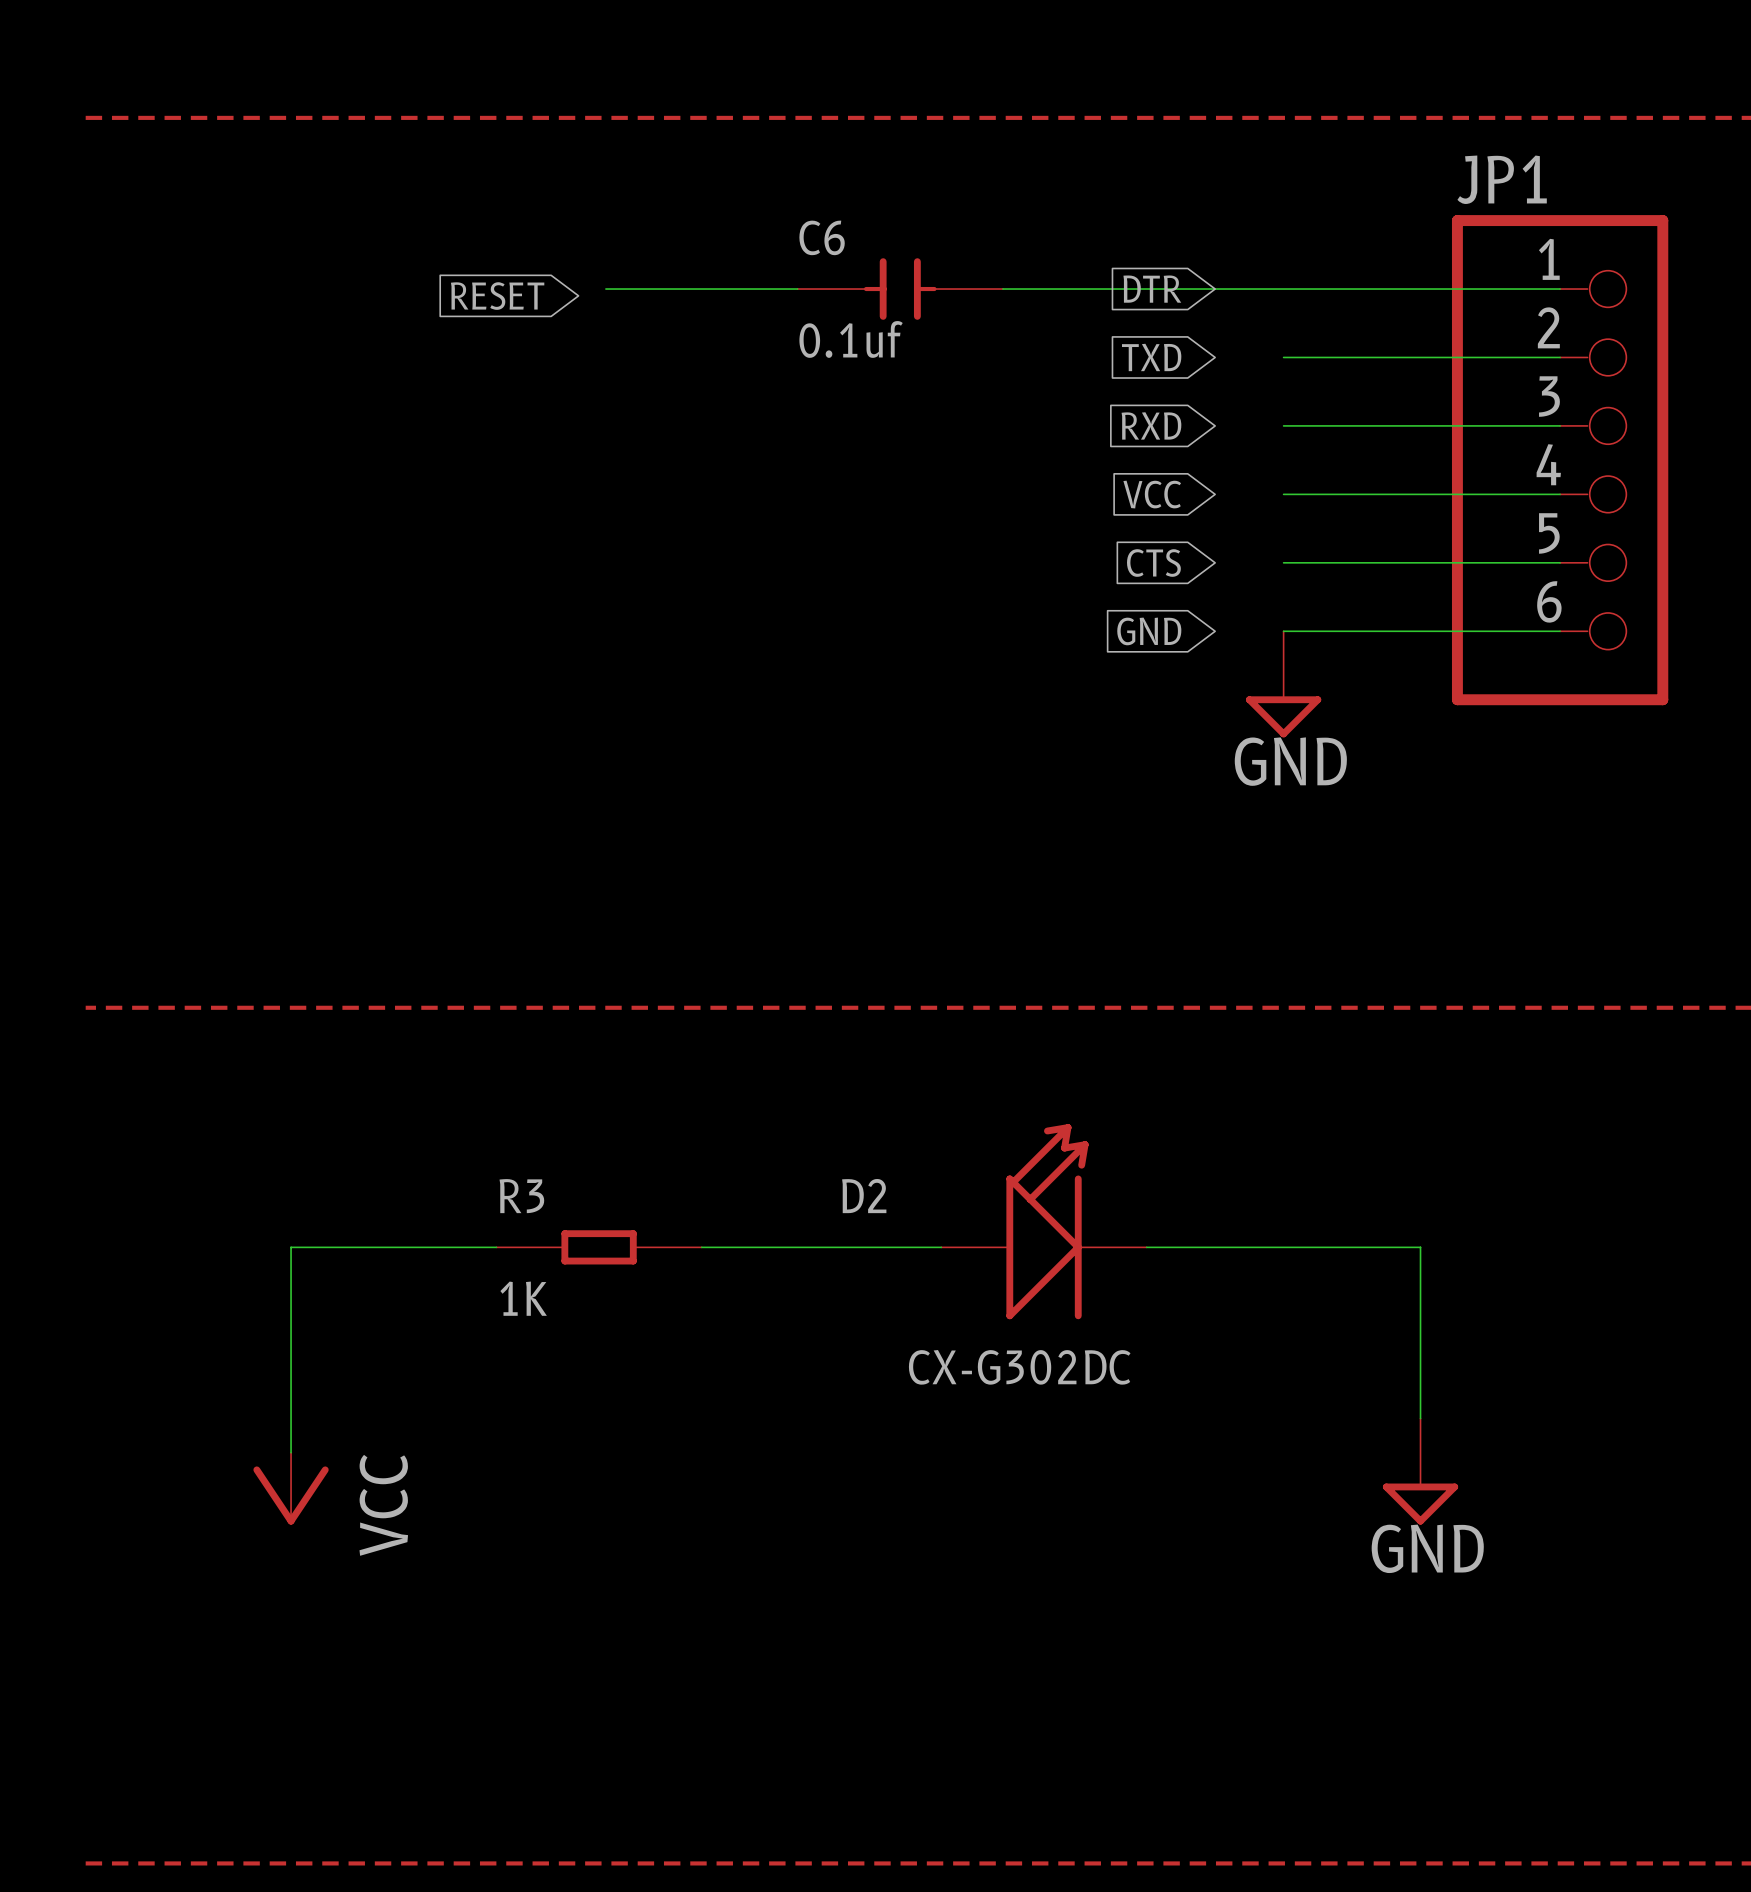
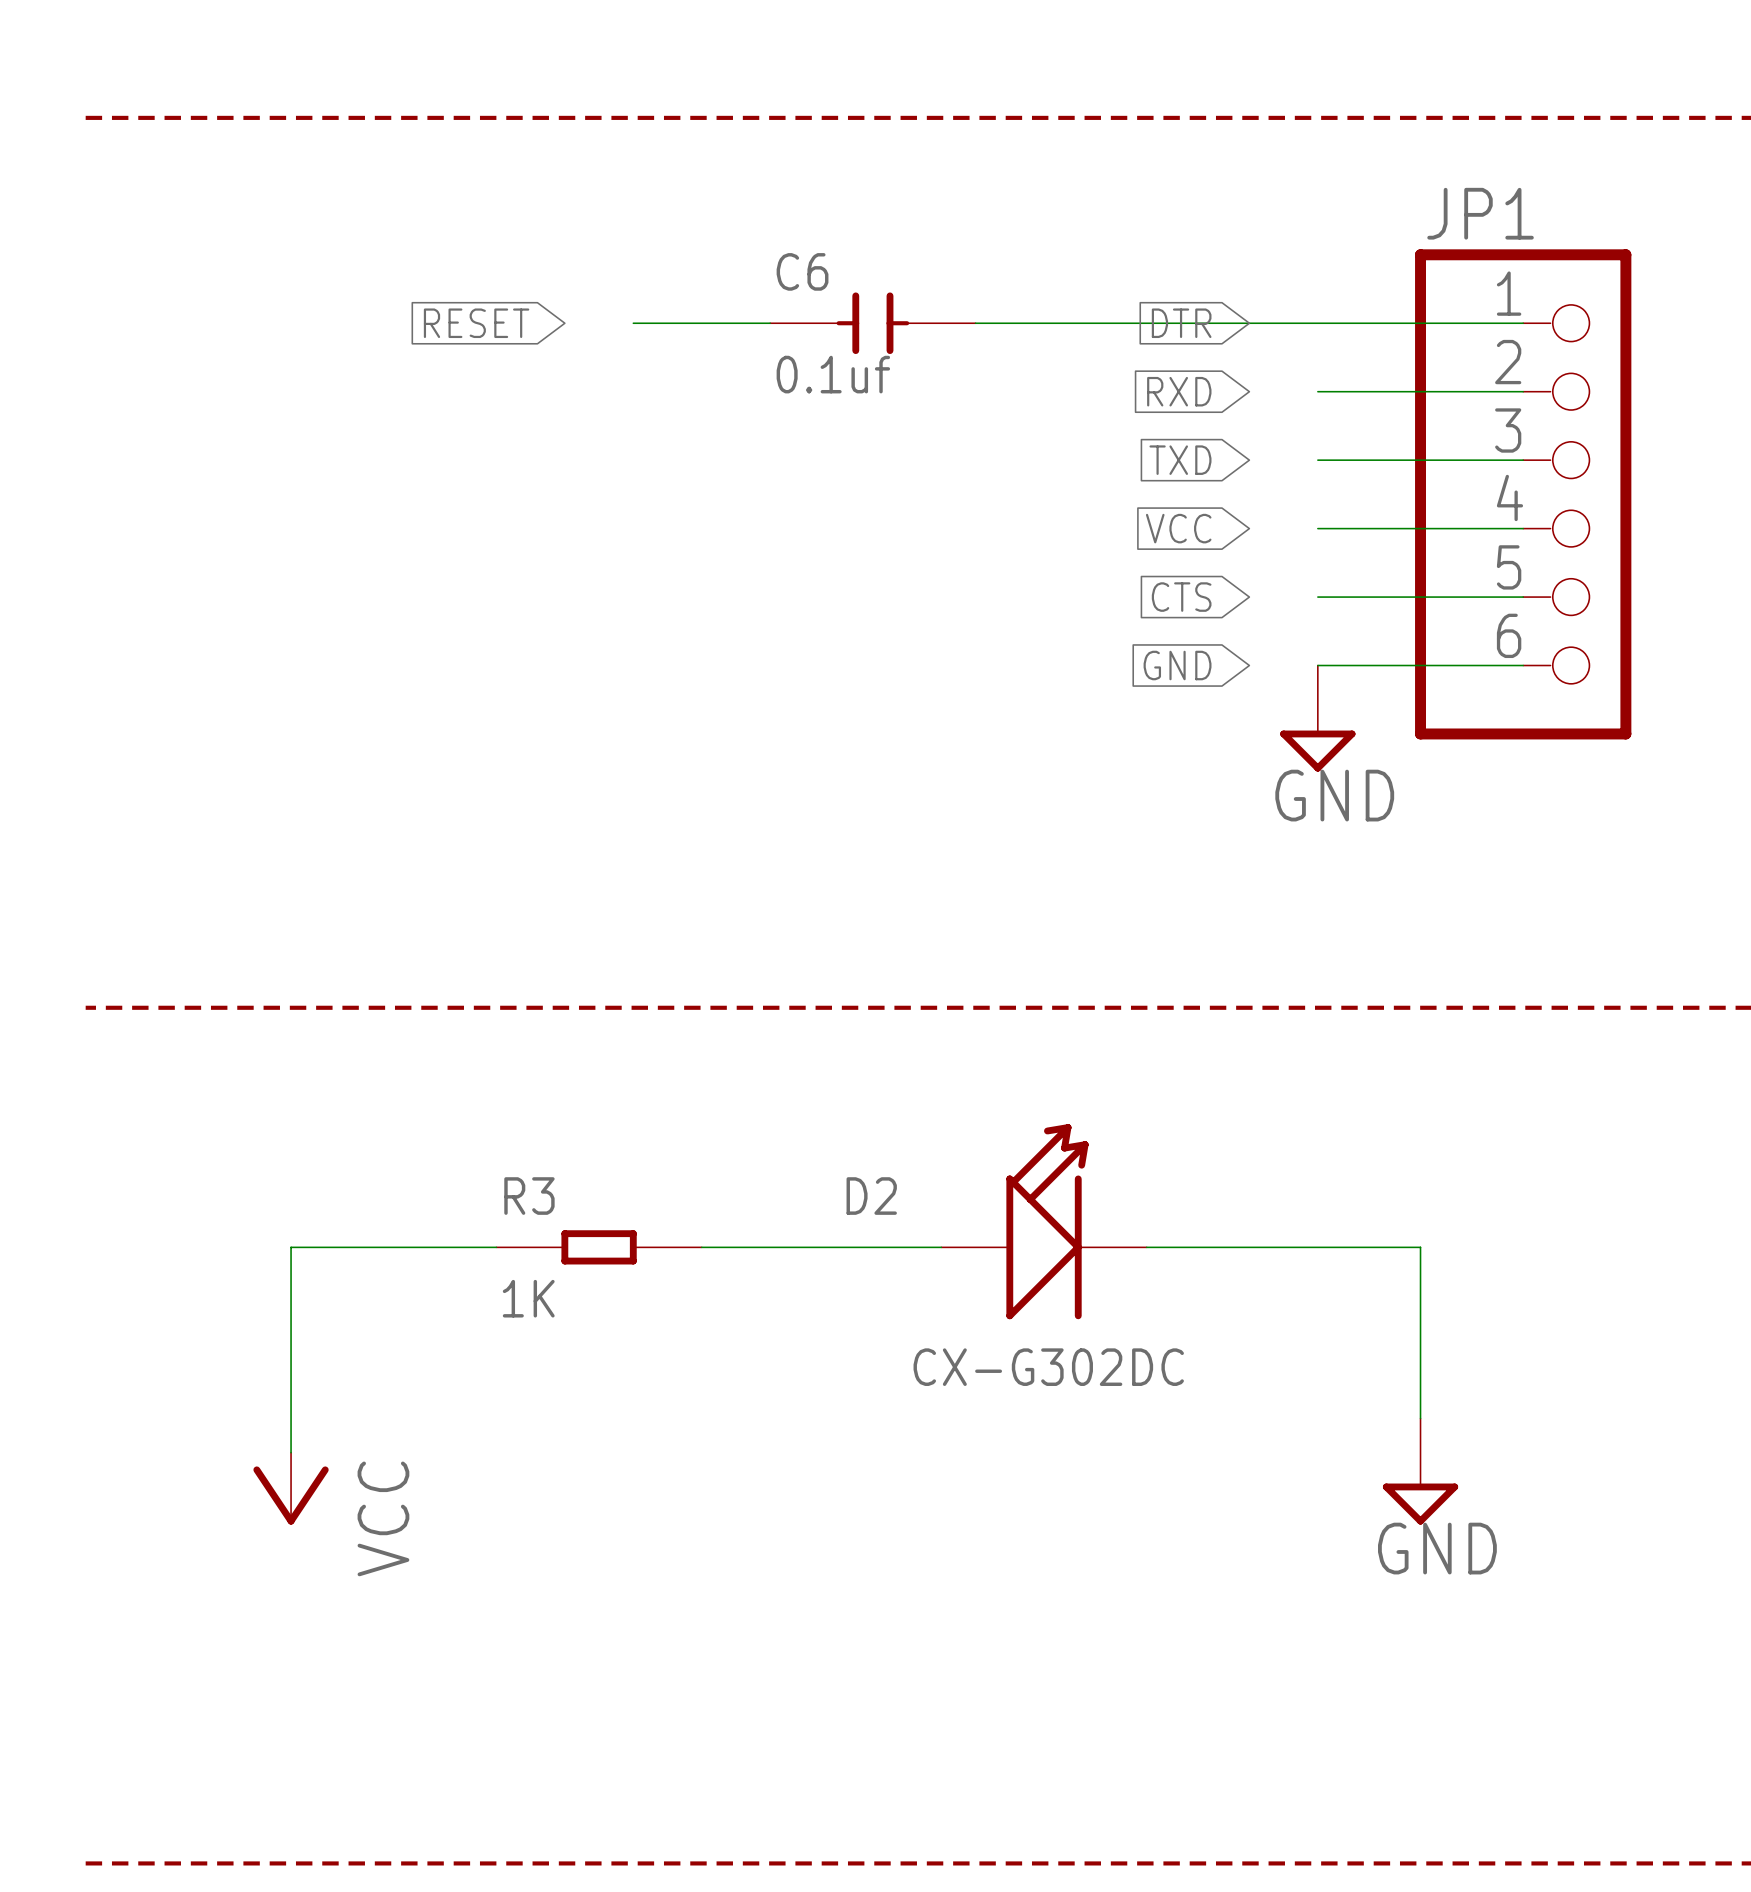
wire: (605, 289) (797, 289) -> none
C6 position: (900, 289) -> (872, 323)
wire: (1002, 289) (1560, 289) -> none
global label position: DTR (1152, 289) -> DTR (1181, 323)
global label position: RESET (497, 296) -> RESET (476, 323)
wire: none -> (633, 323) (770, 323)
wire: none -> (975, 323) (1523, 323)
global label position: TXD (1151, 357) -> TXD (1180, 460)
wire: (1283, 357) (1560, 357) -> none
wire: none -> (1317, 391) (1523, 391)
global label position: RXD (1151, 425) -> RXD (1179, 391)
wire: (1283, 425) (1560, 425) -> none
wire: none -> (1317, 460) (1523, 460)
JP1 position: (1560, 460) -> (1523, 494)
global label position: VCC (1152, 494) -> VCC (1178, 528)
wire: (1283, 494) (1560, 494) -> none
wire: none -> (1317, 528) (1523, 528)
wire: (1283, 562) (1560, 562) -> none
global label position: CTS (1153, 563) -> CTS (1181, 597)
wire: none -> (1317, 597) (1523, 597)
global label position: GND (1149, 631) -> GND (1177, 665)
wire: (1283, 631) (1560, 631) -> none
wire: none -> (1317, 665) (1523, 665)
power symbol position: GND (1283, 684) -> GND (1317, 718)

